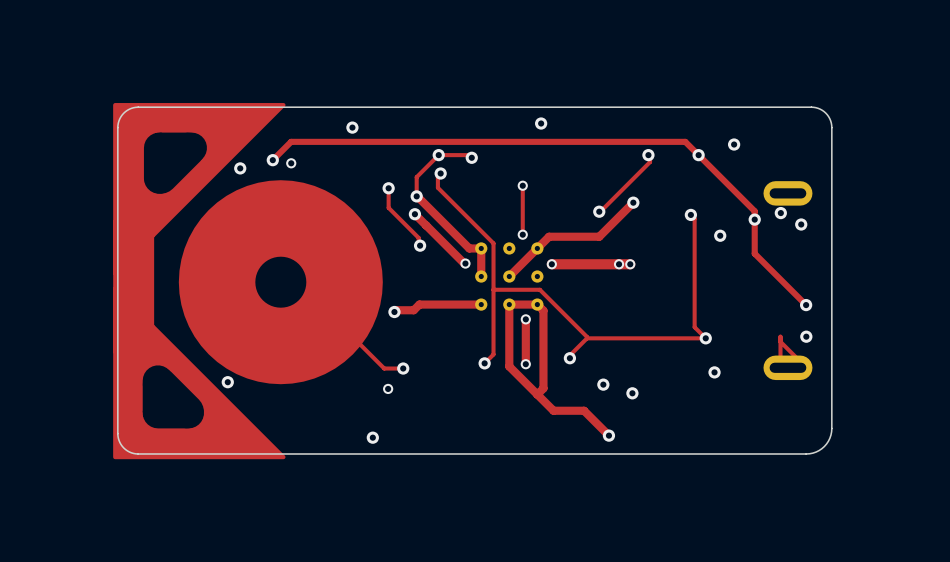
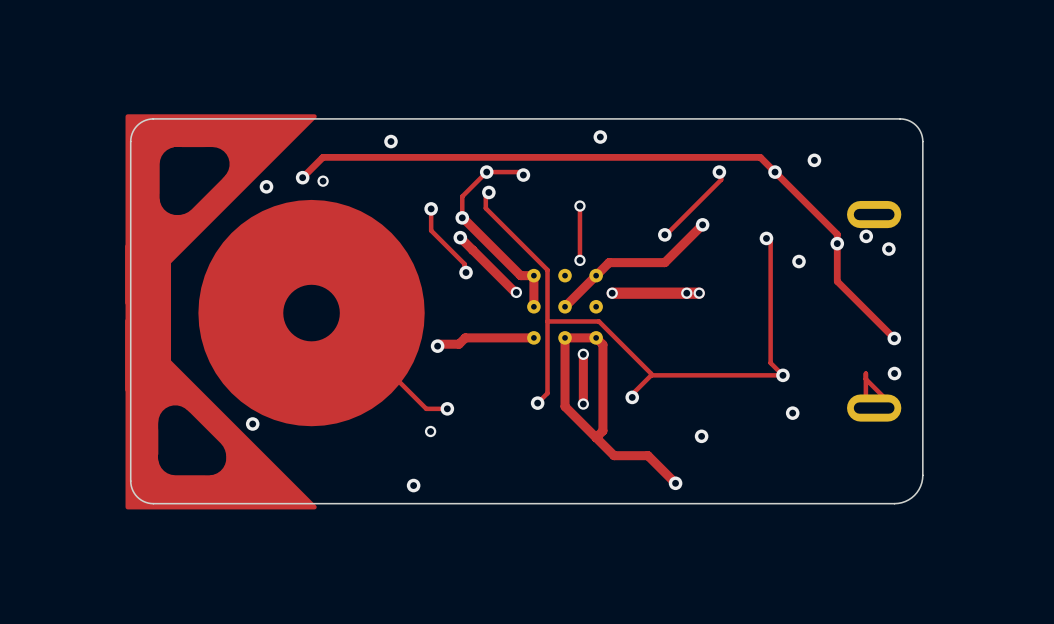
via: (603, 384) -> none

